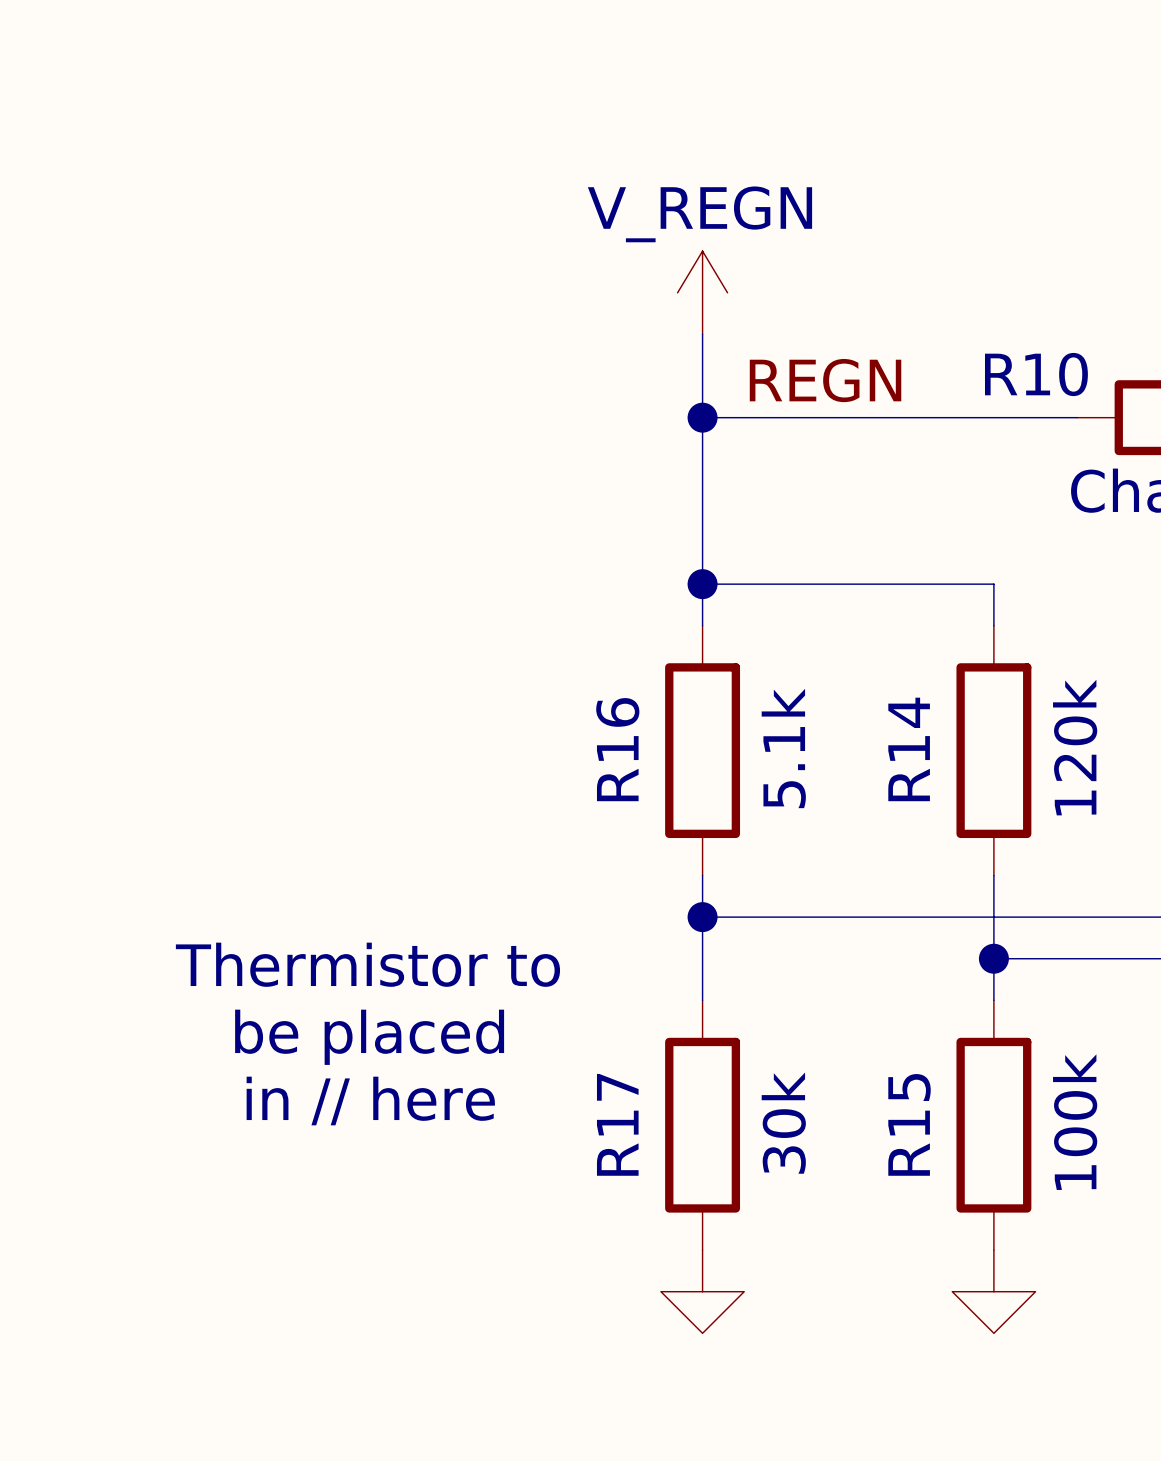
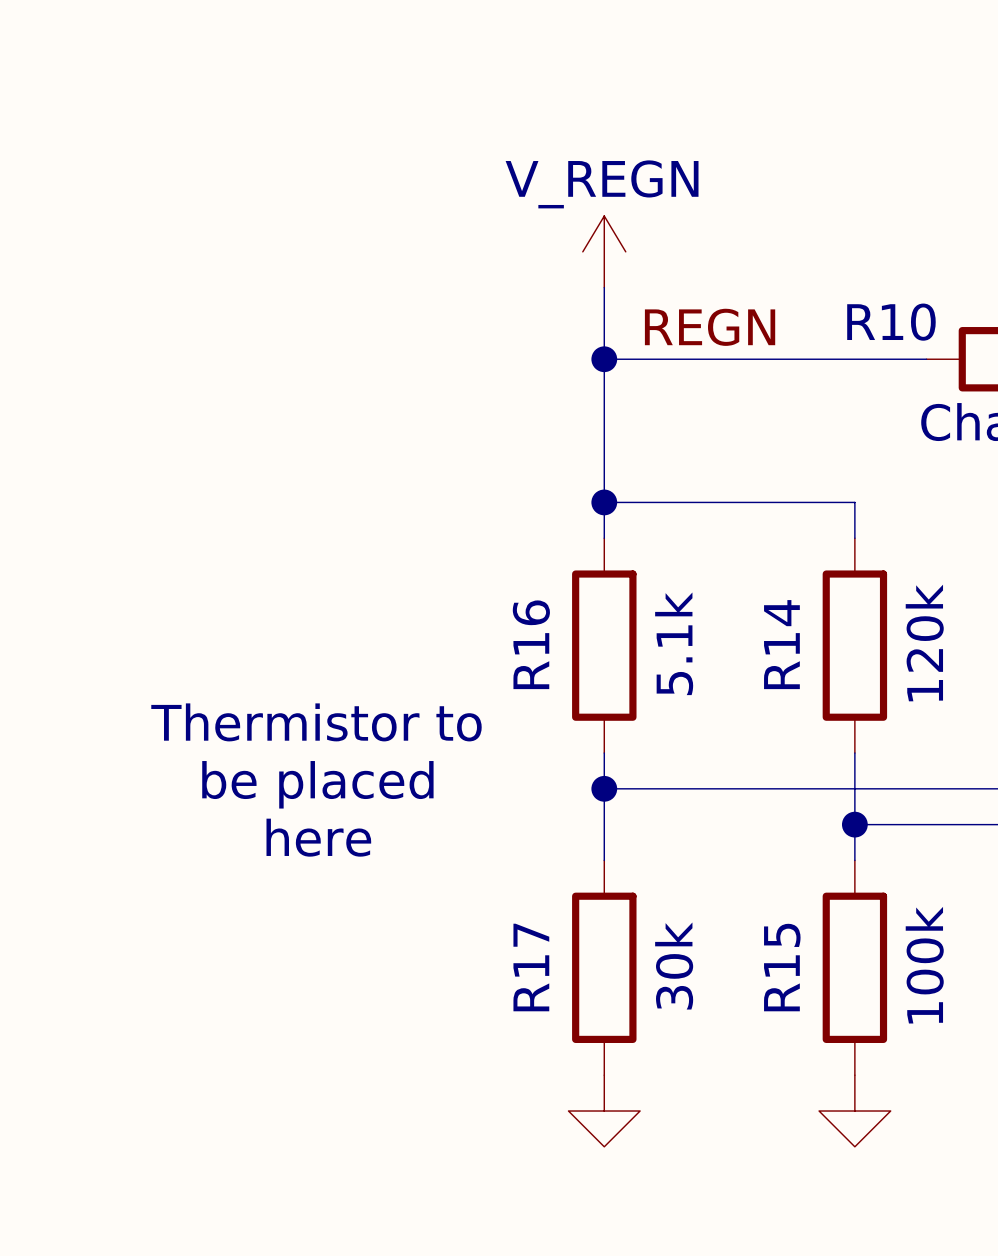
text position: Thermistor to (367, 964) -> Thermistor to (316, 722)
text: none -> here (318, 837)
text position: be placed (369, 1037) -> be placed (317, 784)
text: in // here (370, 1101) -> none

